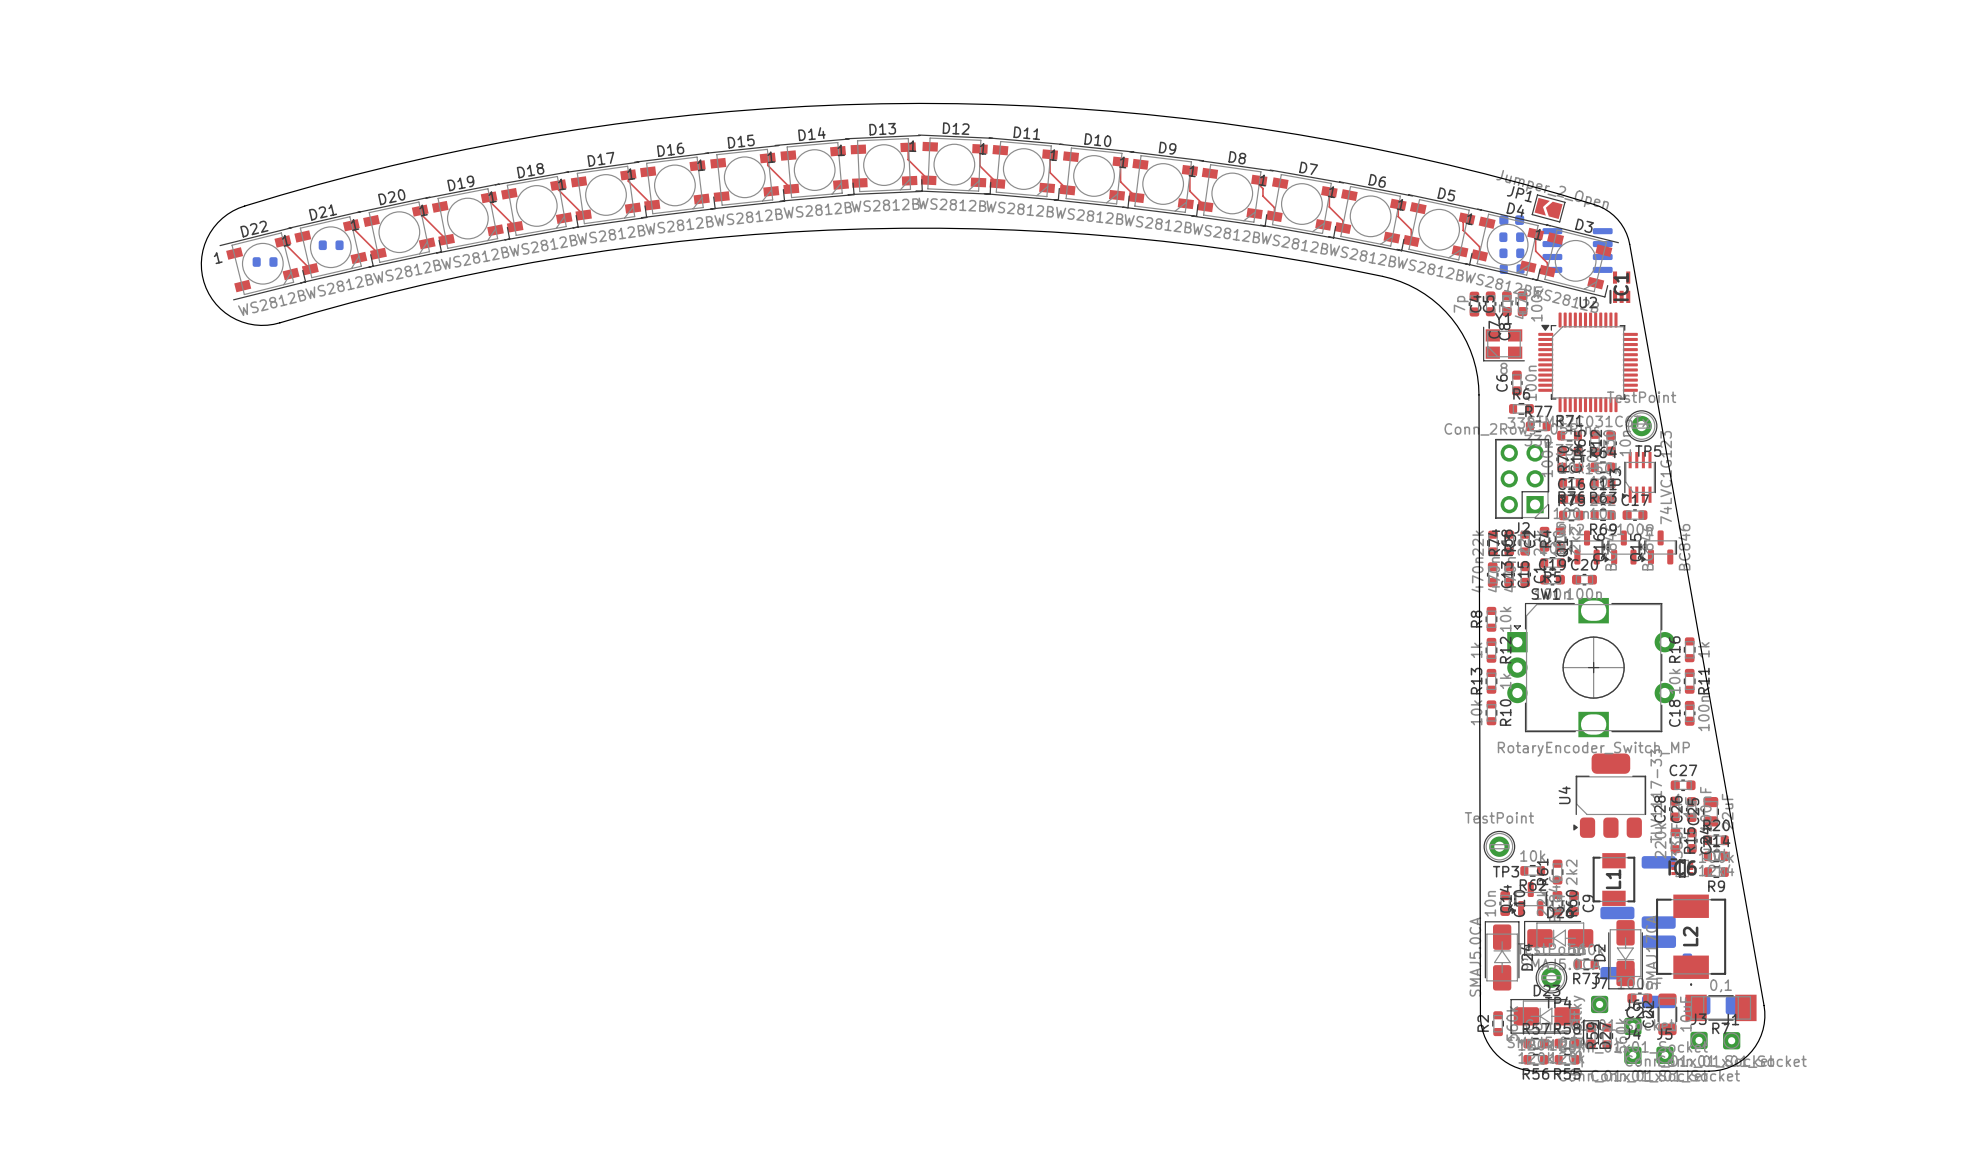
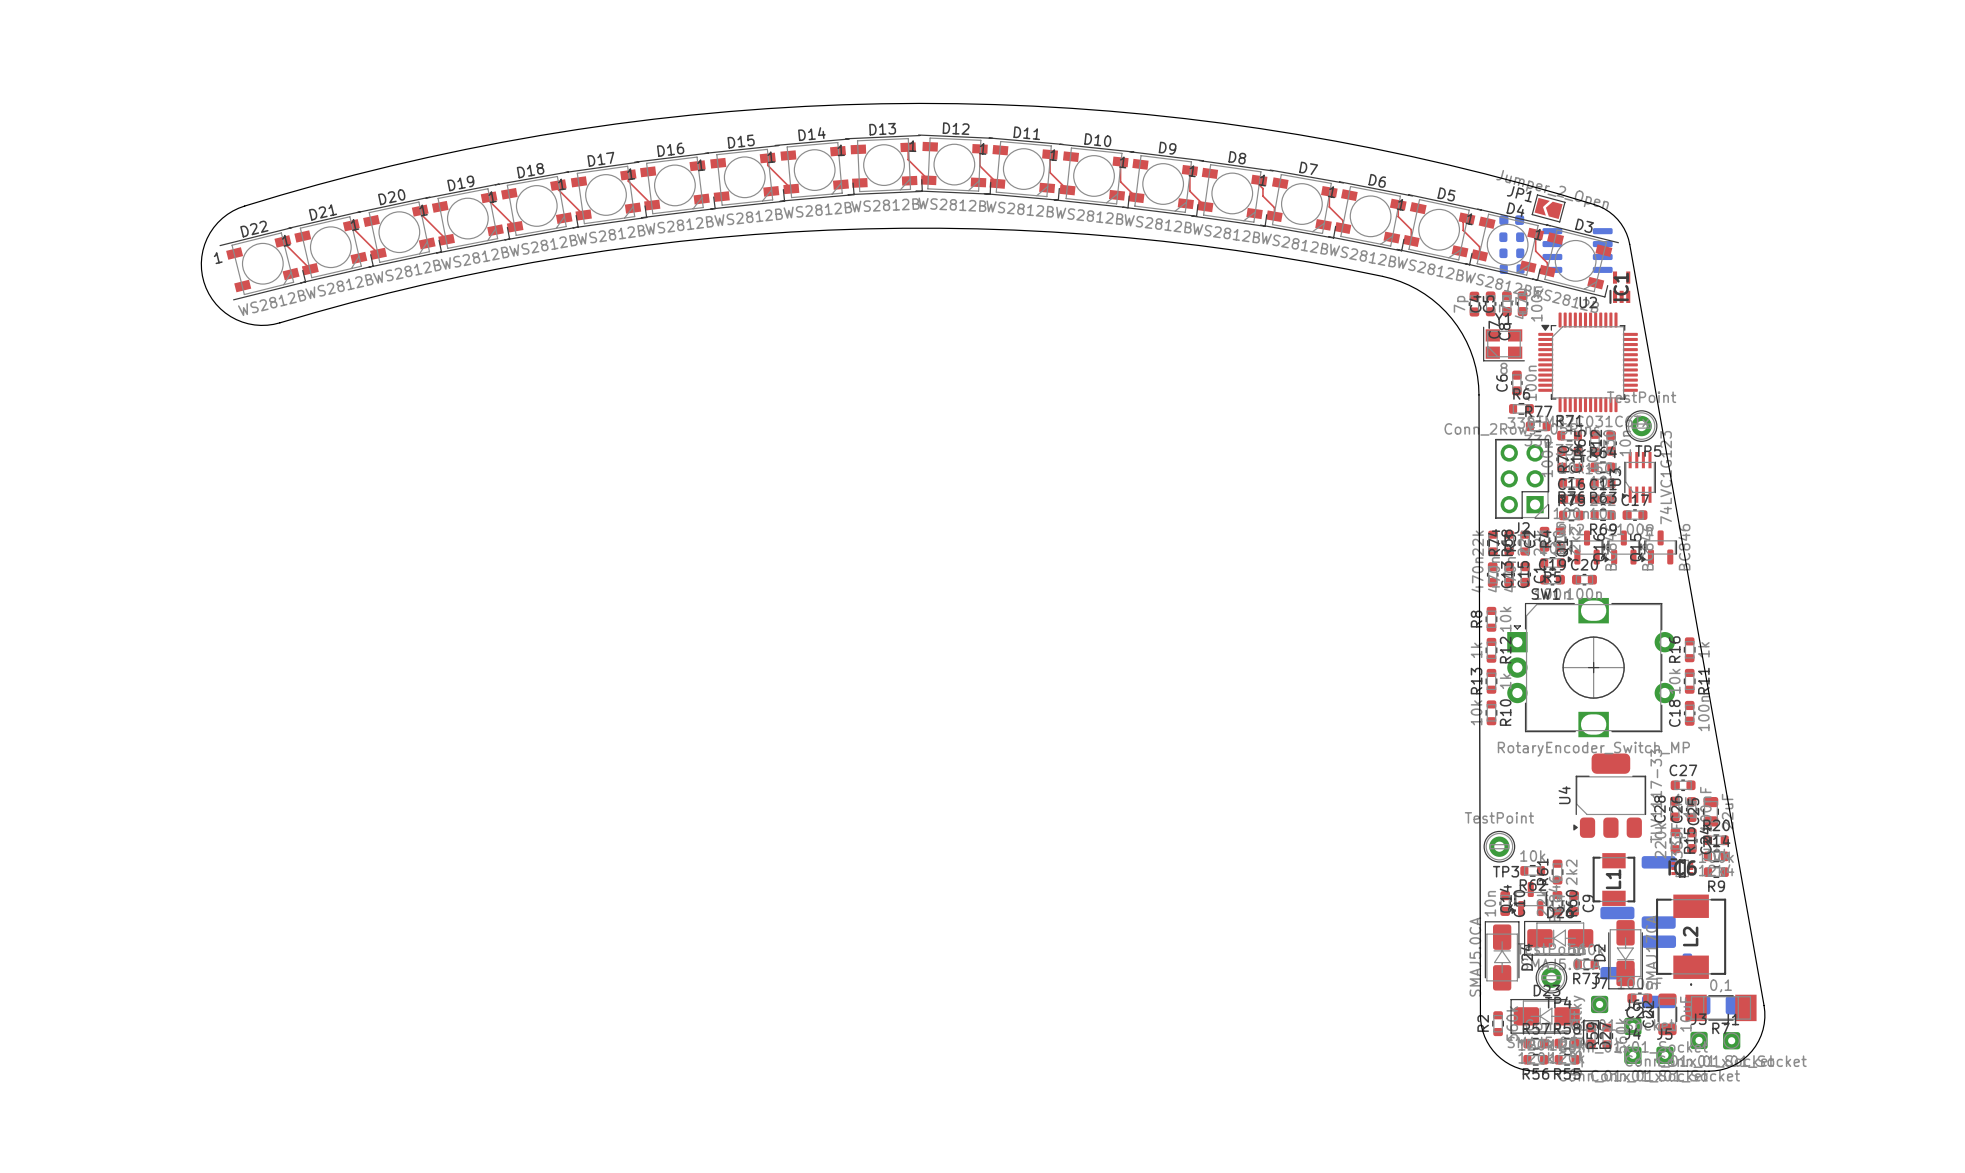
part: (331, 245) -> none
part: (265, 262) -> none

